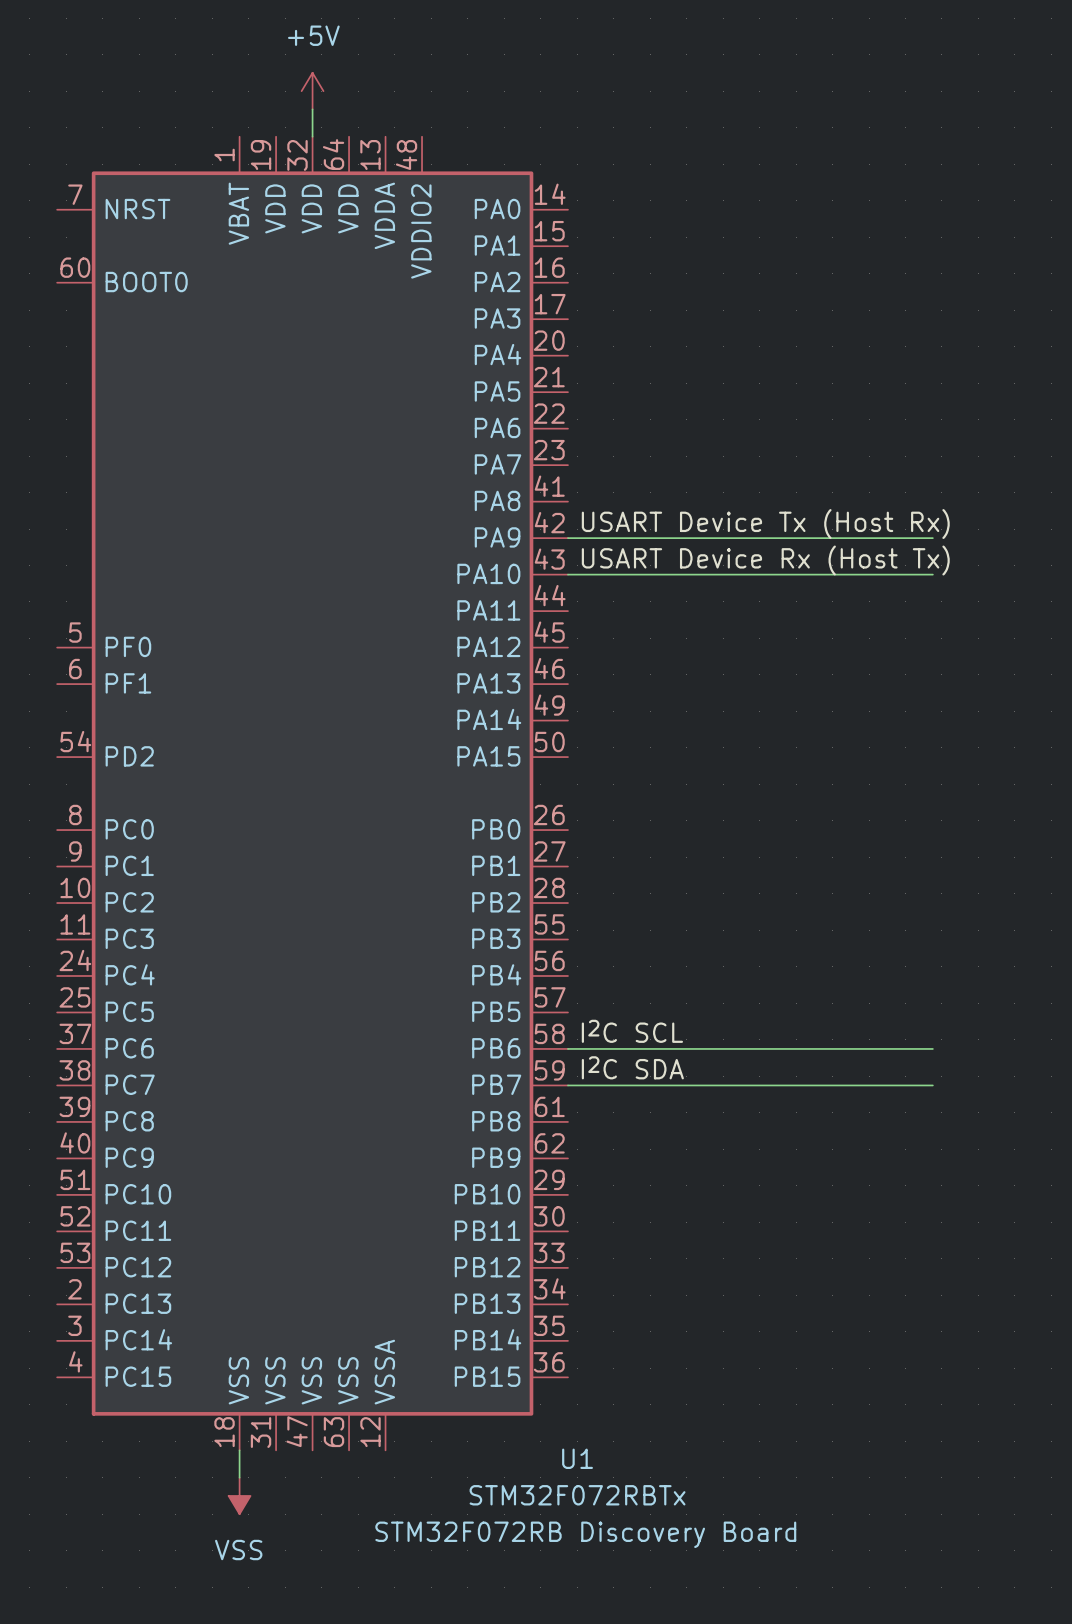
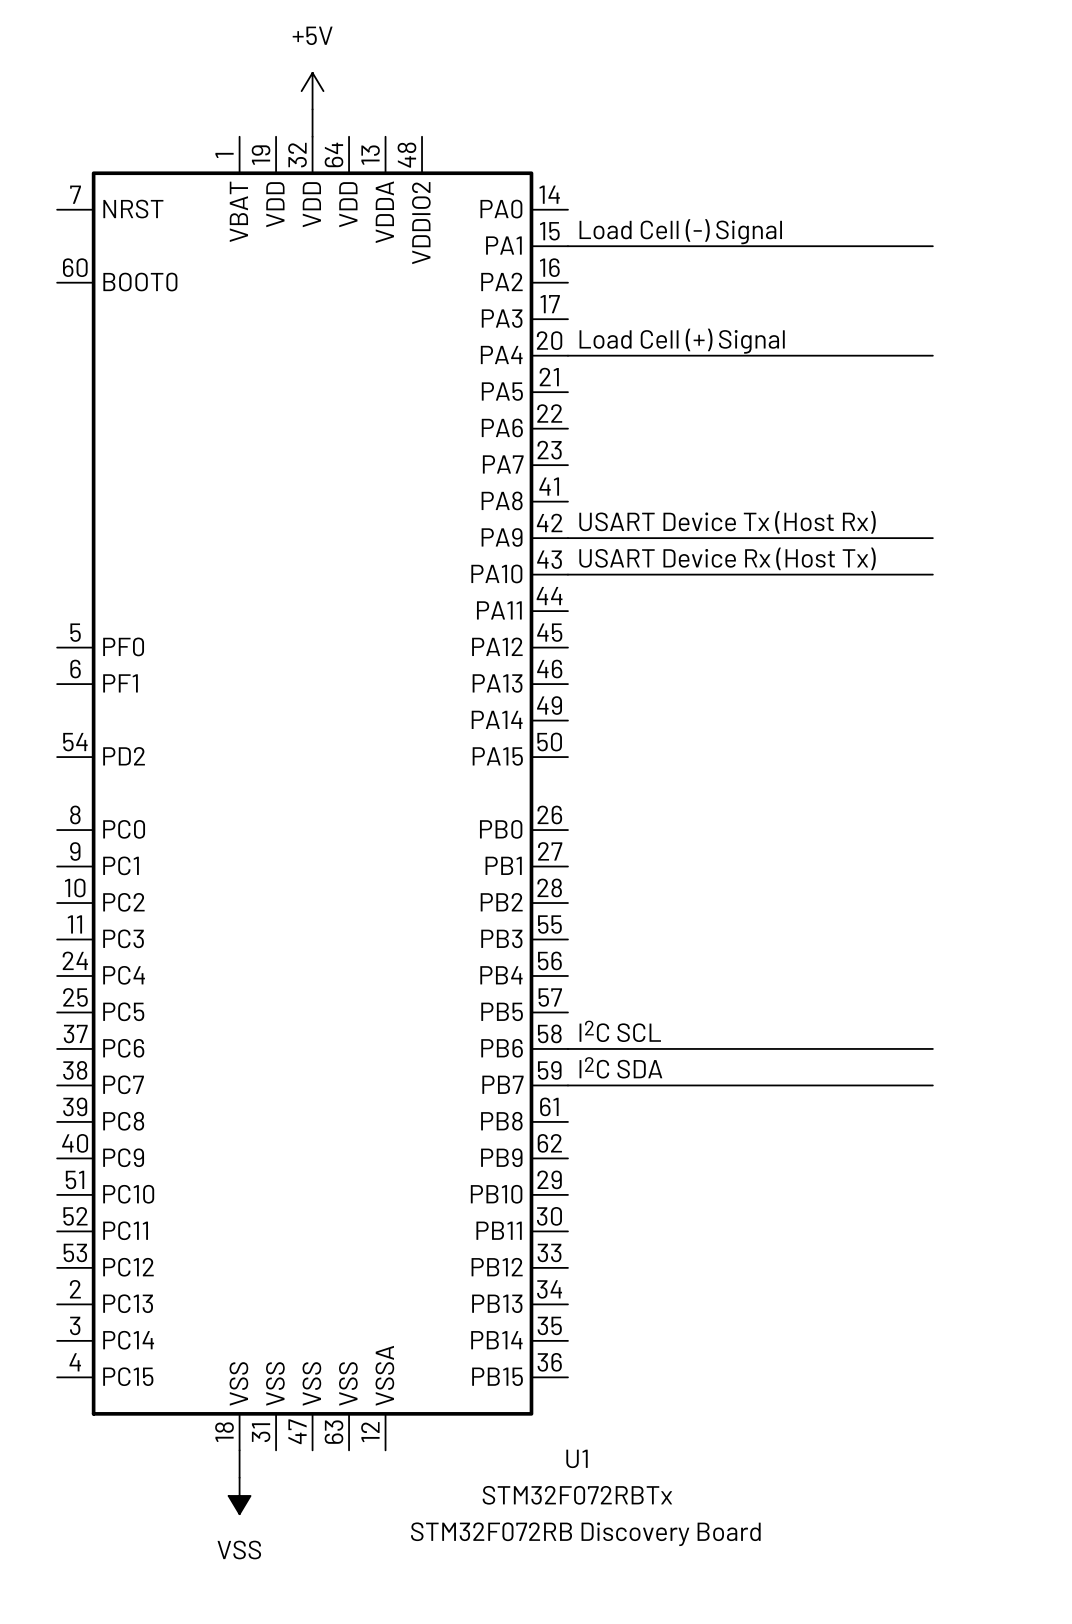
label: none -> Load Cell (-) Signal (680, 231)
wire: none -> (567, 246) (932, 246)
label: none -> Load Cell (+) Signal (682, 341)
wire: none -> (567, 355) (932, 355)

